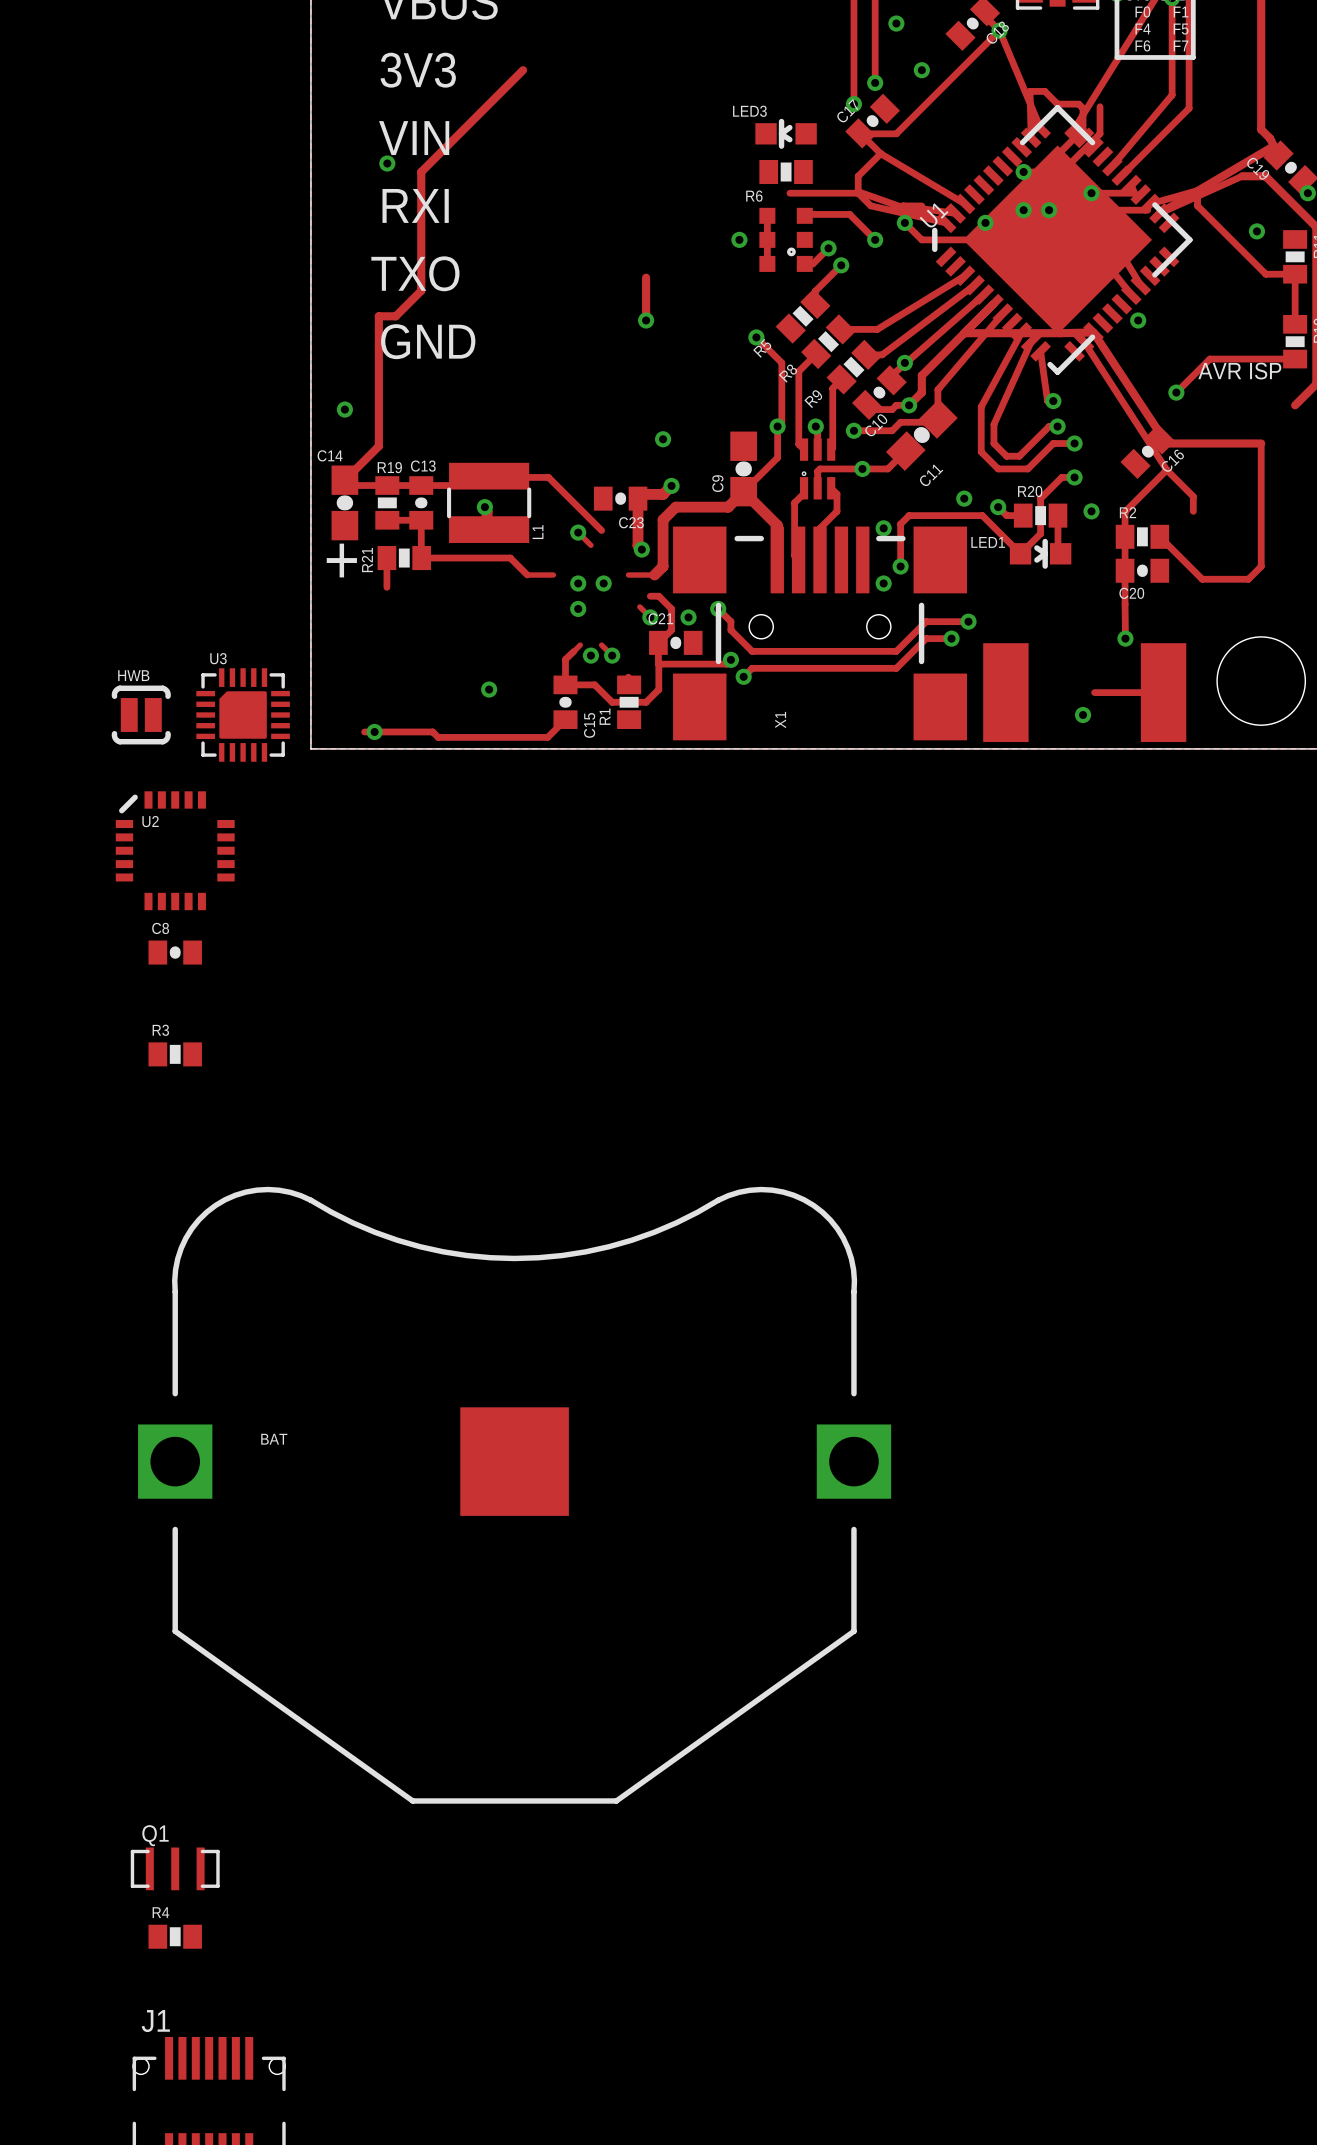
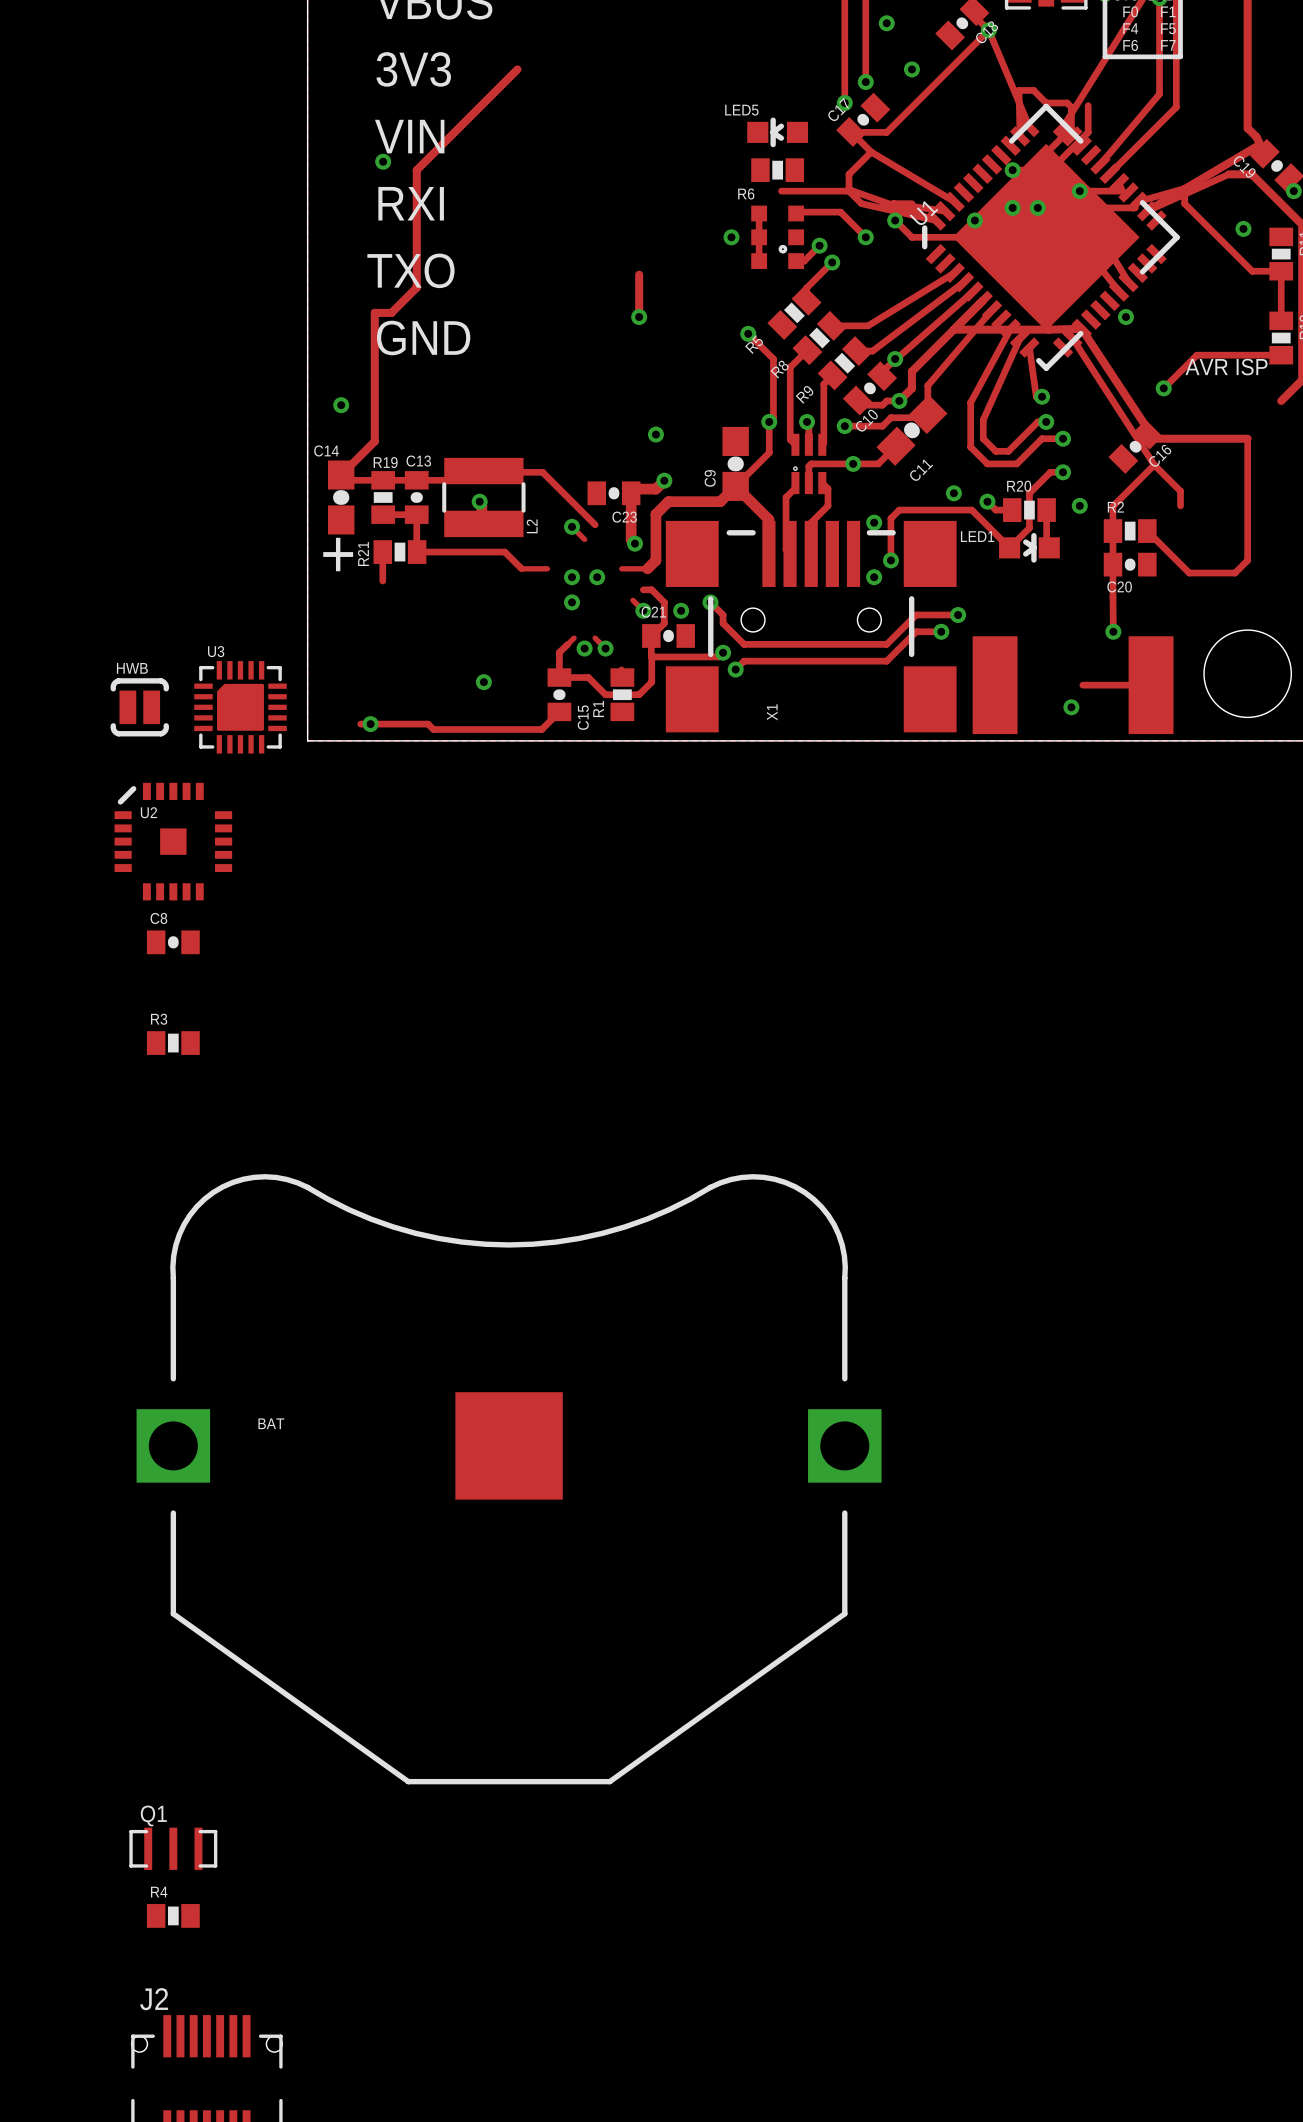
LED3 name: LED3 (749, 111) -> LED5 (741, 110)
L1 name: L1 (538, 532) -> L2 (532, 526)
U2 footprint: [115, 791, 235, 911] -> [114, 782, 233, 901]
J1 name: J1 (155, 2021) -> J2 (154, 1999)

